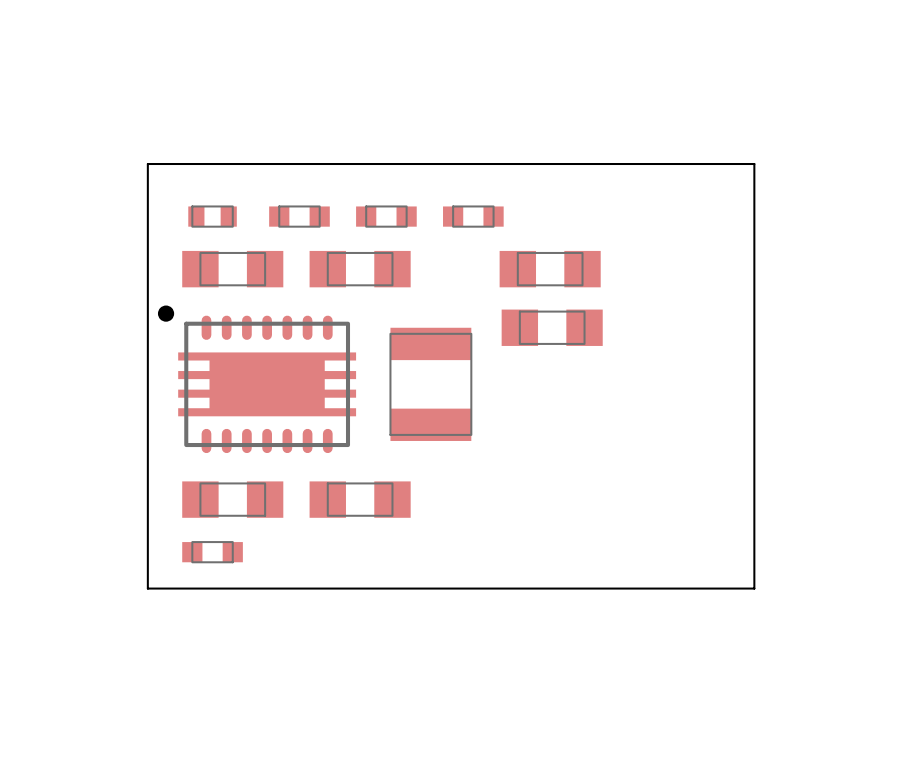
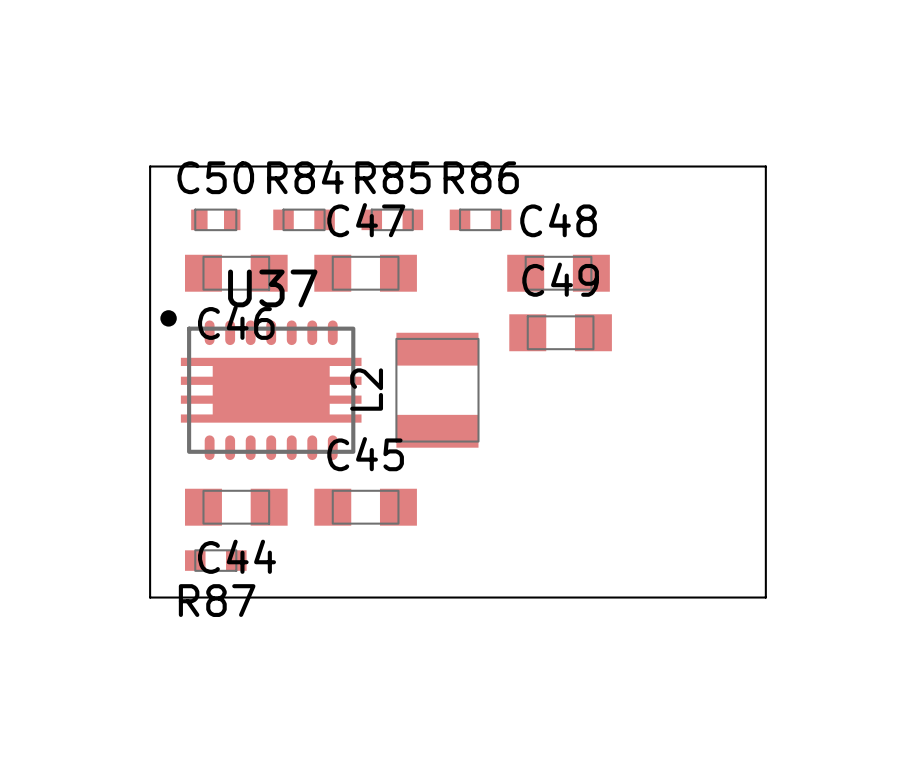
R84 name: none -> R84 (305, 177)
C50 name: none -> C50 (215, 177)
R85 name: none -> R85 (392, 177)
R86 name: none -> R86 (481, 177)
C47 name: none -> C47 (366, 220)
C48 name: none -> C48 (558, 220)
C49 name: none -> C49 (560, 279)
U37 name: none -> U37 (272, 288)
C46 name: none -> C46 (236, 322)
L2 name: none -> L2 (366, 389)
C45 name: none -> C45 (365, 454)
C44 name: none -> C44 (236, 556)
R87 name: none -> R87 (217, 600)

